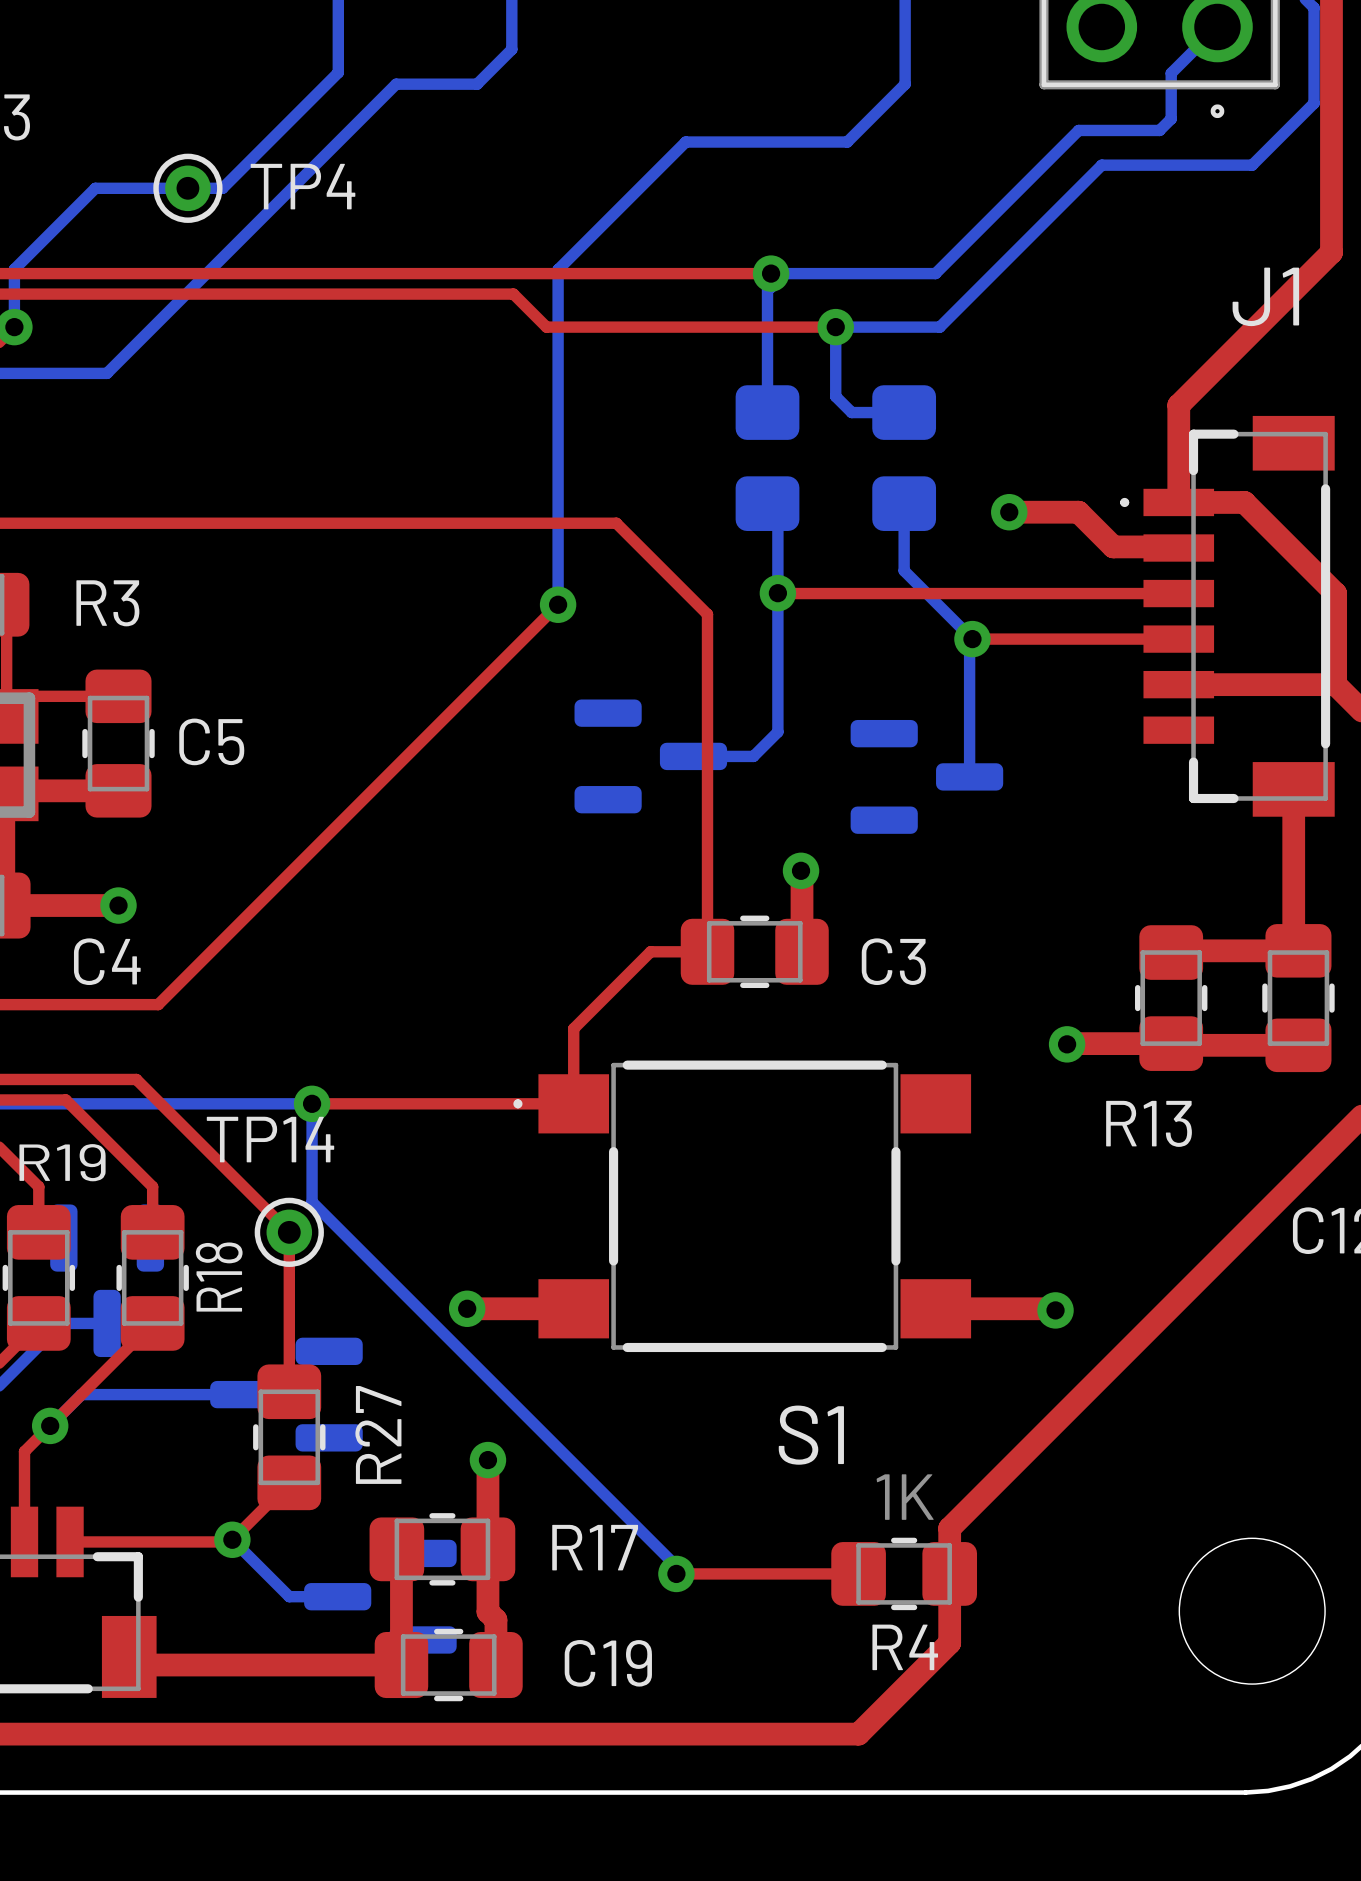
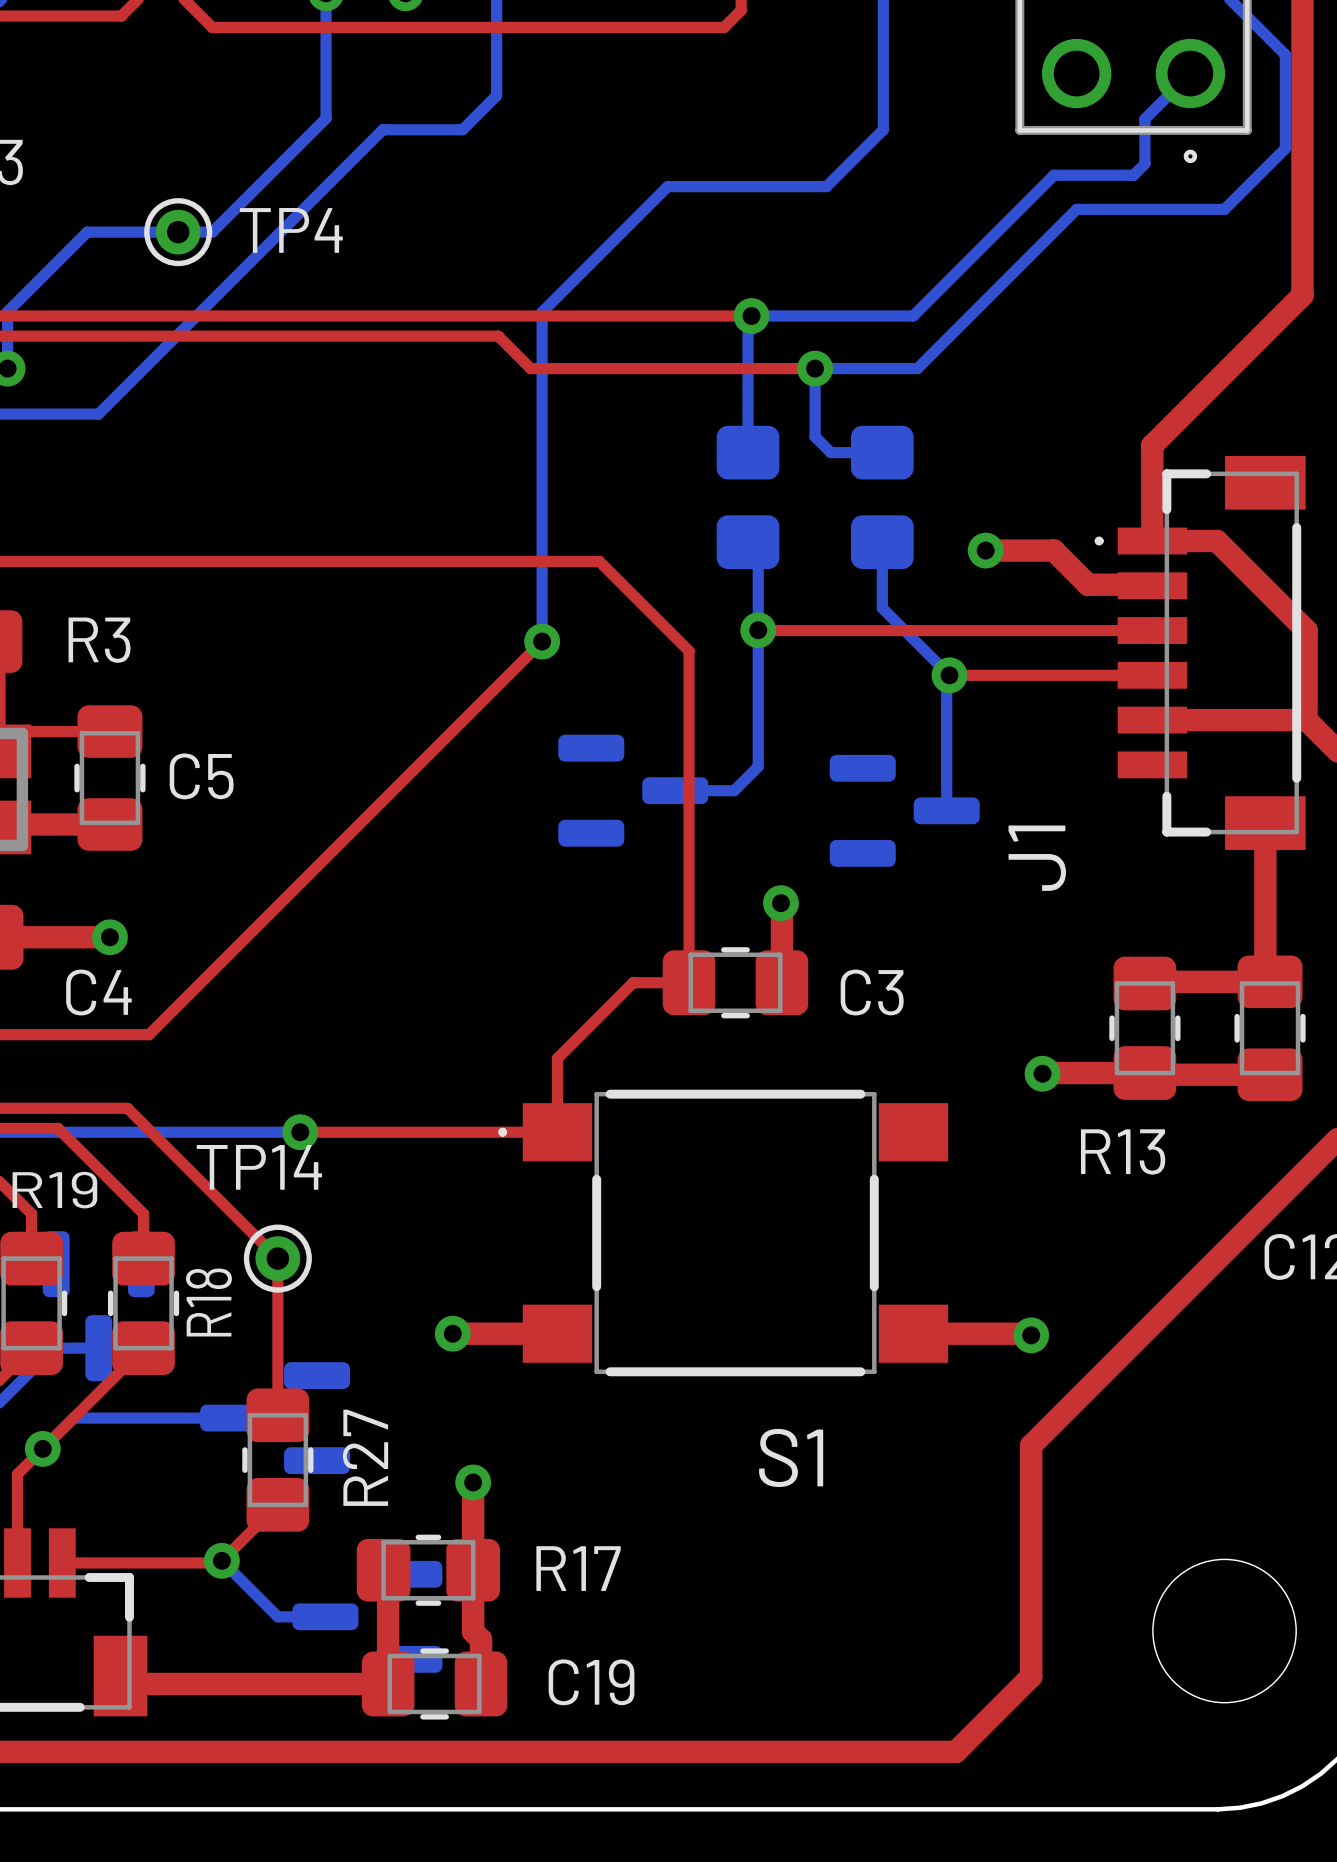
J1 name rotation: 0° (1265, 296) -> 90° counterclockwise (1037, 858)
J1 name position: J1 (1265, 296) -> J1 (1037, 858)
bottom track: (312, 1103) (312, 1201) (676, 1566) (676, 1573) -> none
top track: (1055, 1422) (949, 1528) (949, 1643) (858, 1734) -> (1031, 1445) (1031, 1676) (955, 1751) (837, 1751)
top track: (676, 1573) (858, 1573) -> none
via: (676, 1573) -> none
R4: 1K (904, 1573) -> none

